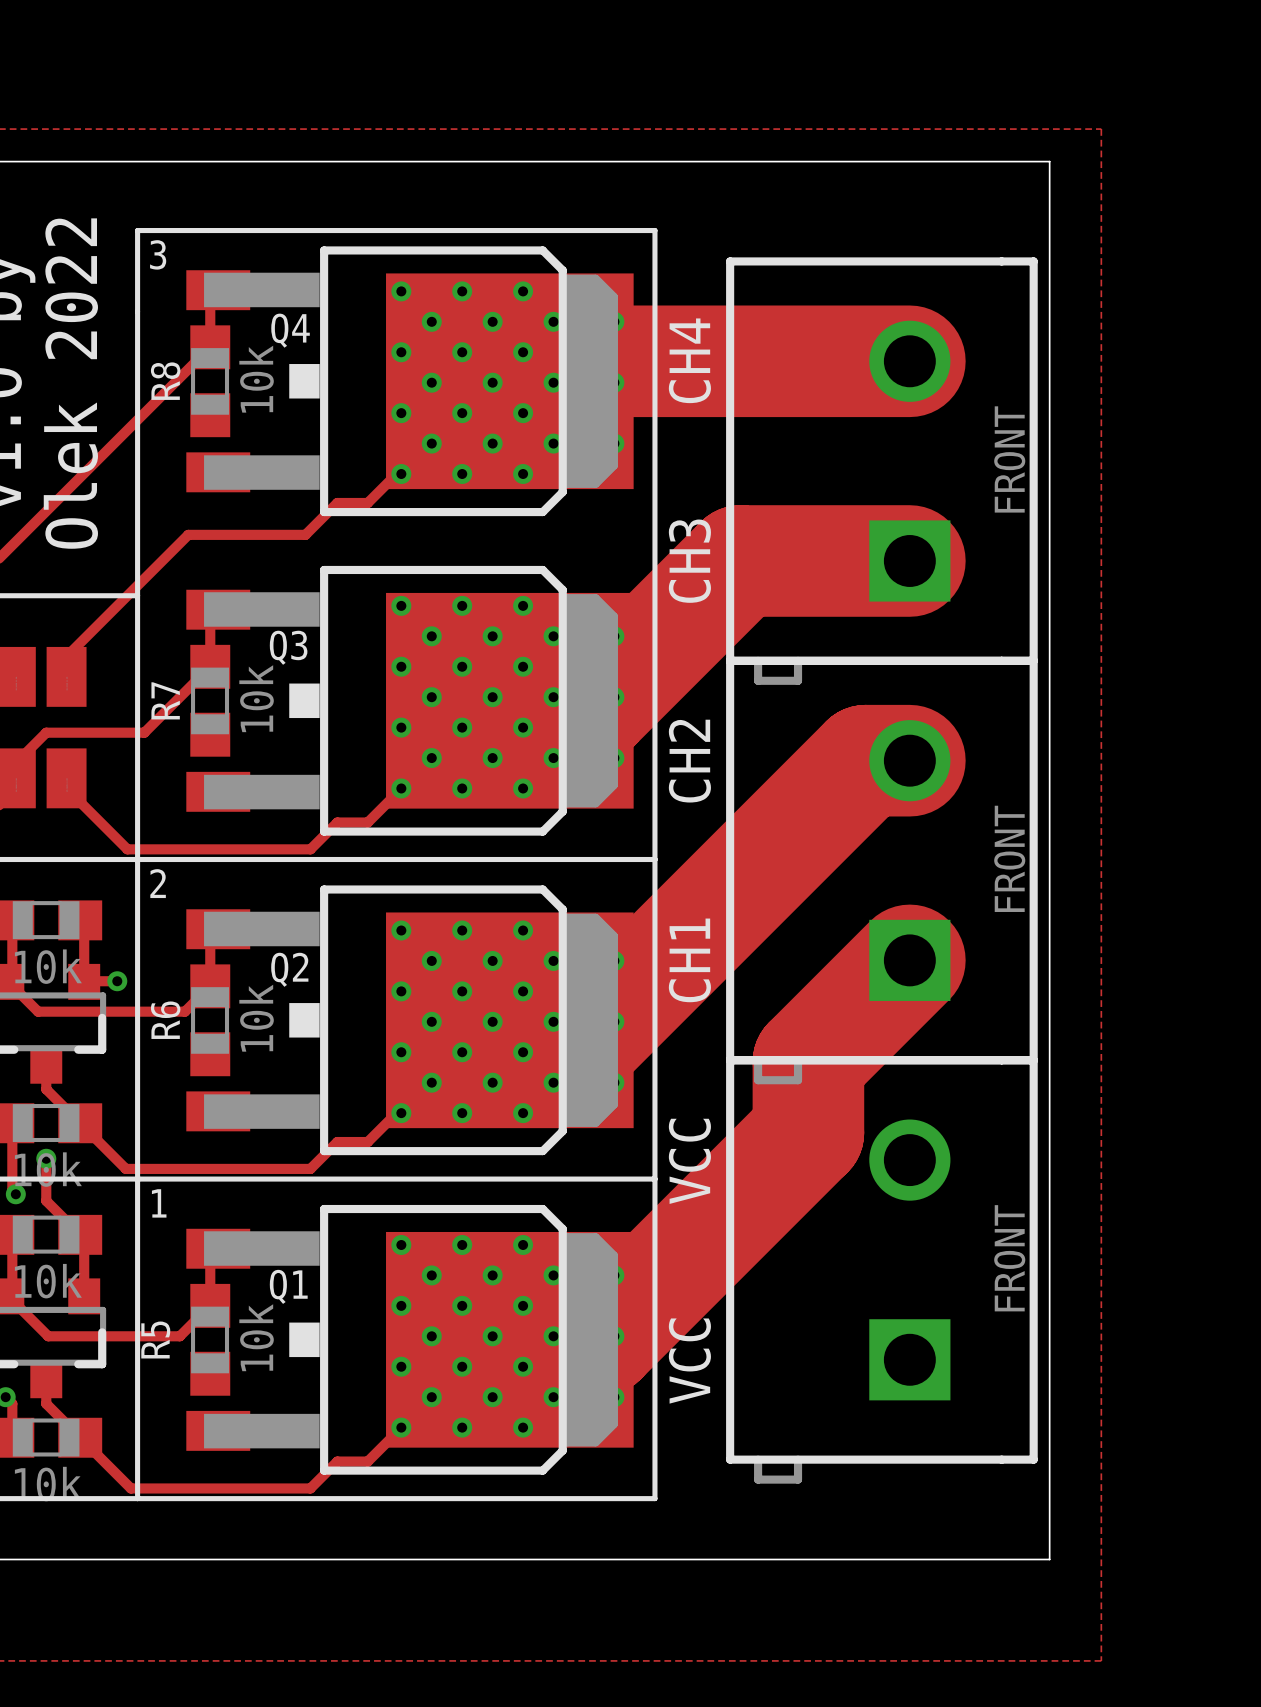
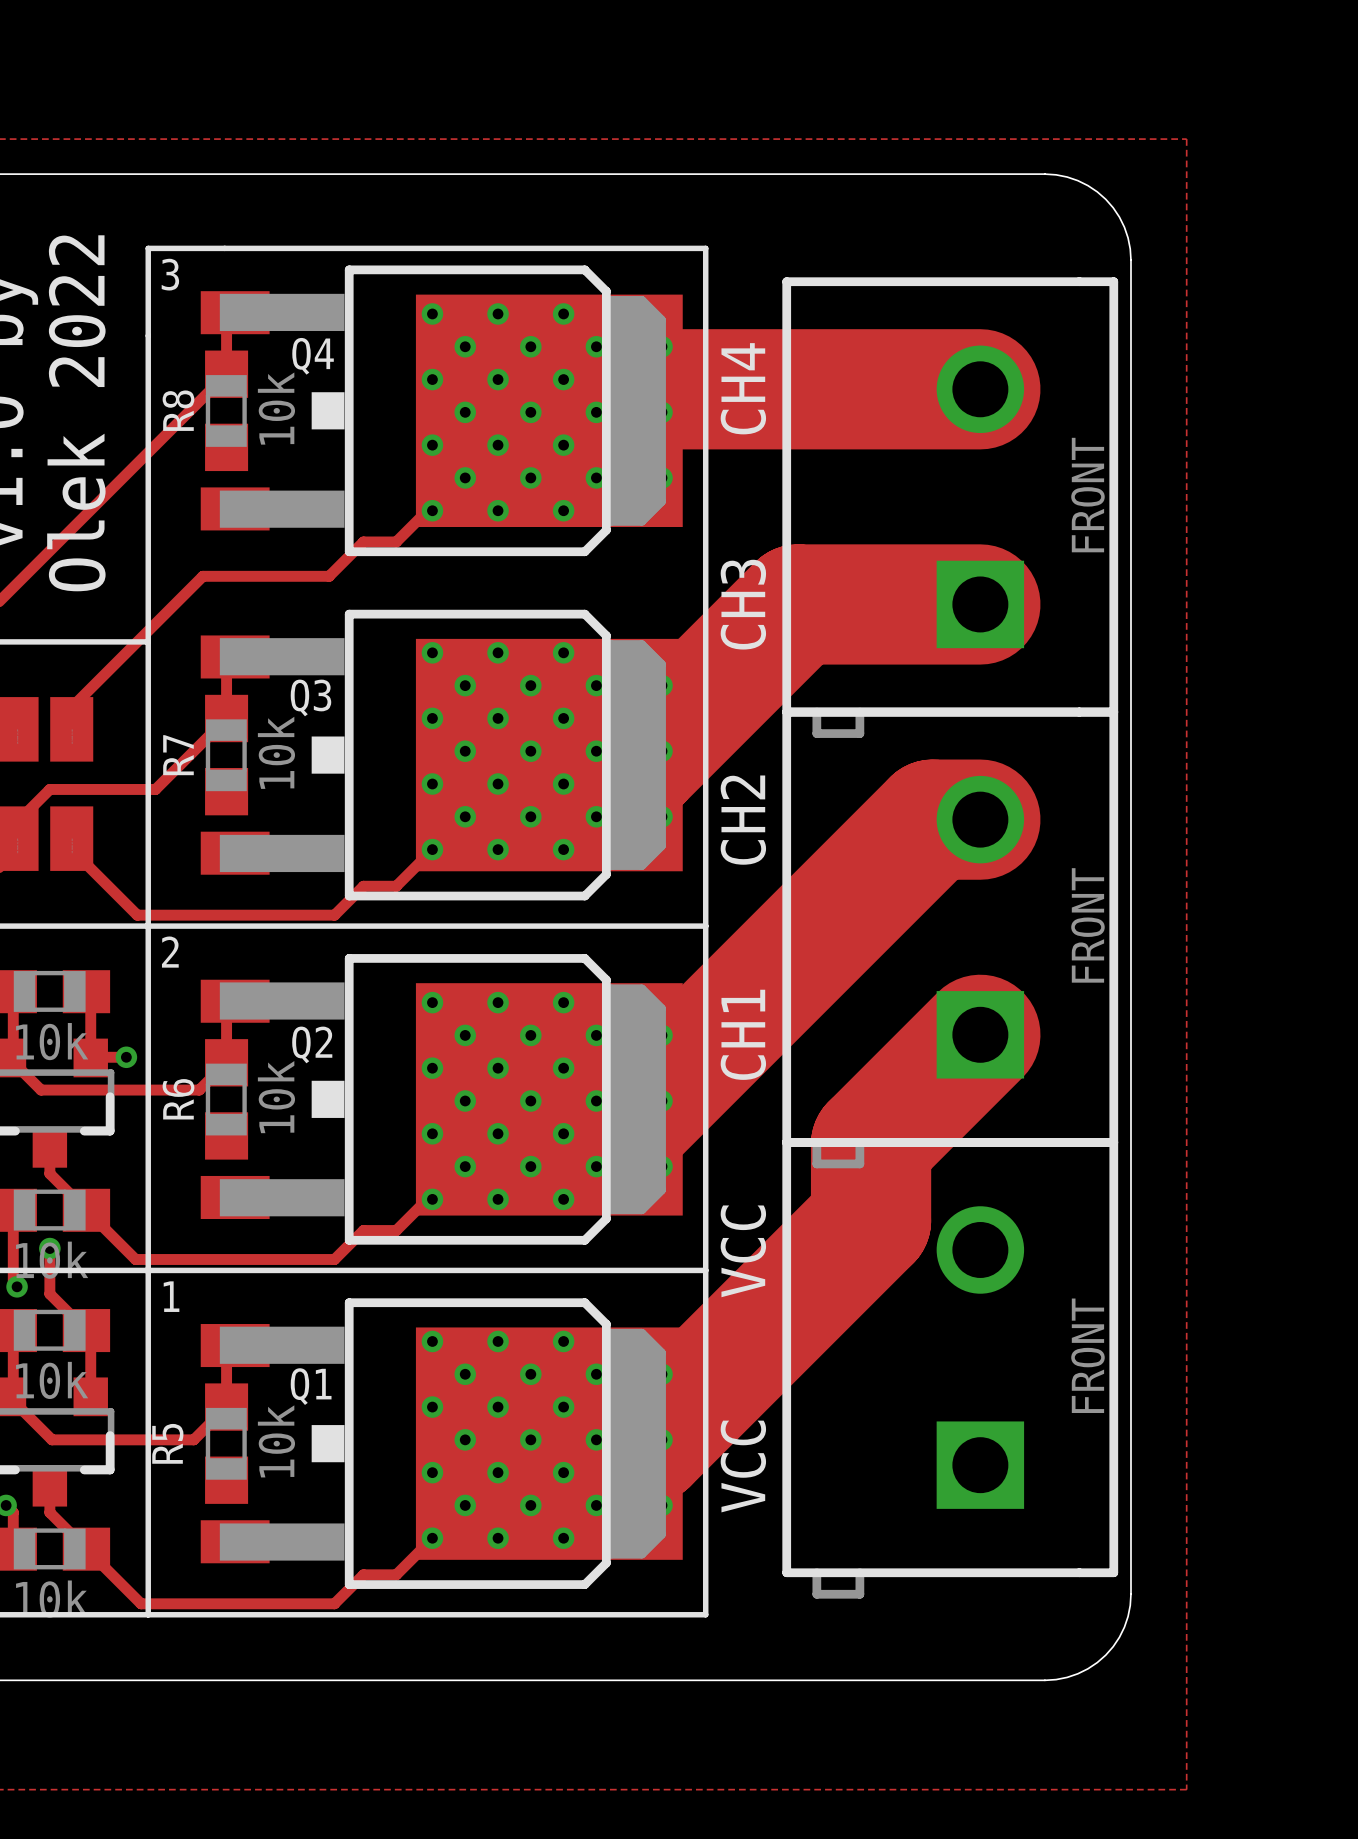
board edge: (969, 161) (1049, 161) (1049, 241) -> (1044, 174) (1077, 180) (1105, 199) (1124, 227) (1130, 260)
board edge: (1049, 1479) (1049, 1559) (969, 1559) -> (1130, 1594) (1124, 1627) (1105, 1655) (1077, 1673) (1044, 1680)

